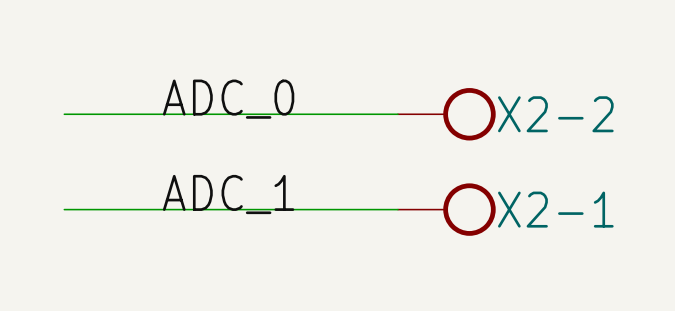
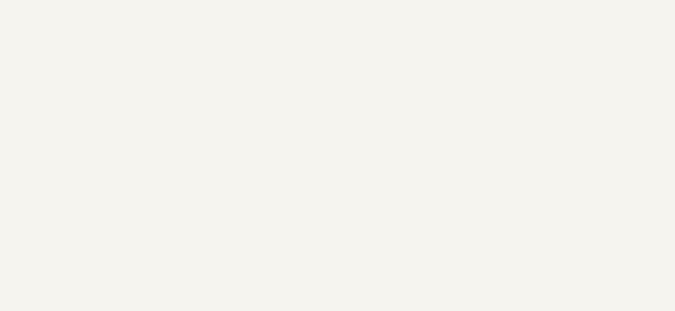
label: ADC_0 (228, 99) -> none
wire: (64, 114) (397, 114) -> none
X2-2: (446, 114) -> none
label: ADC_1 (228, 194) -> none
wire: (64, 209) (397, 209) -> none
X2-1: (446, 209) -> none

